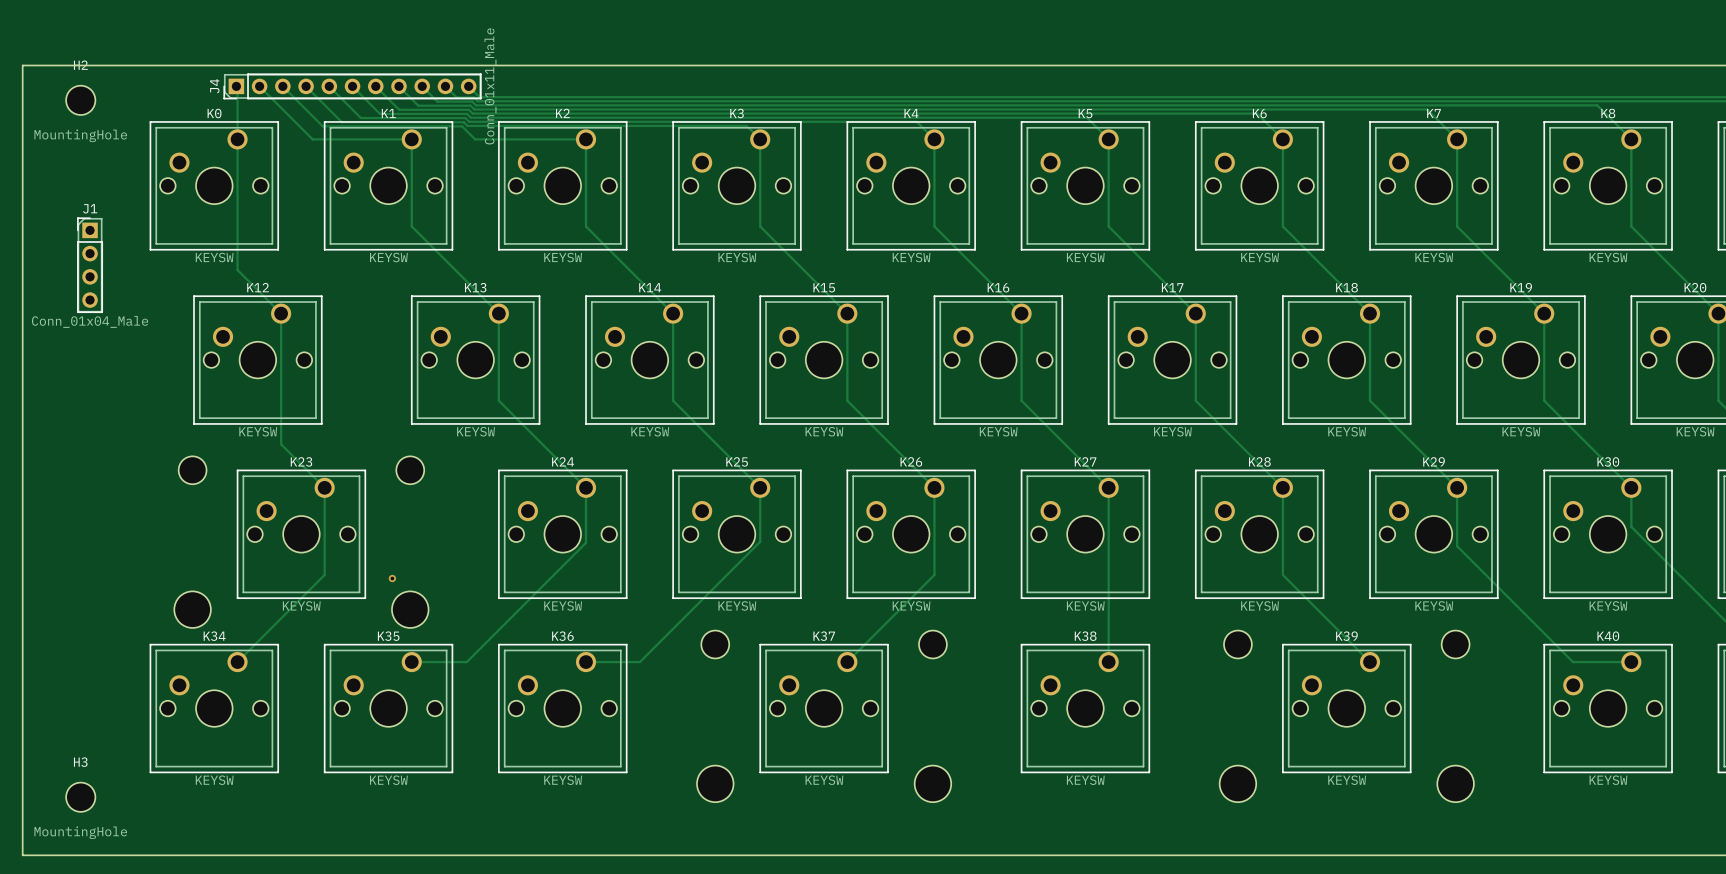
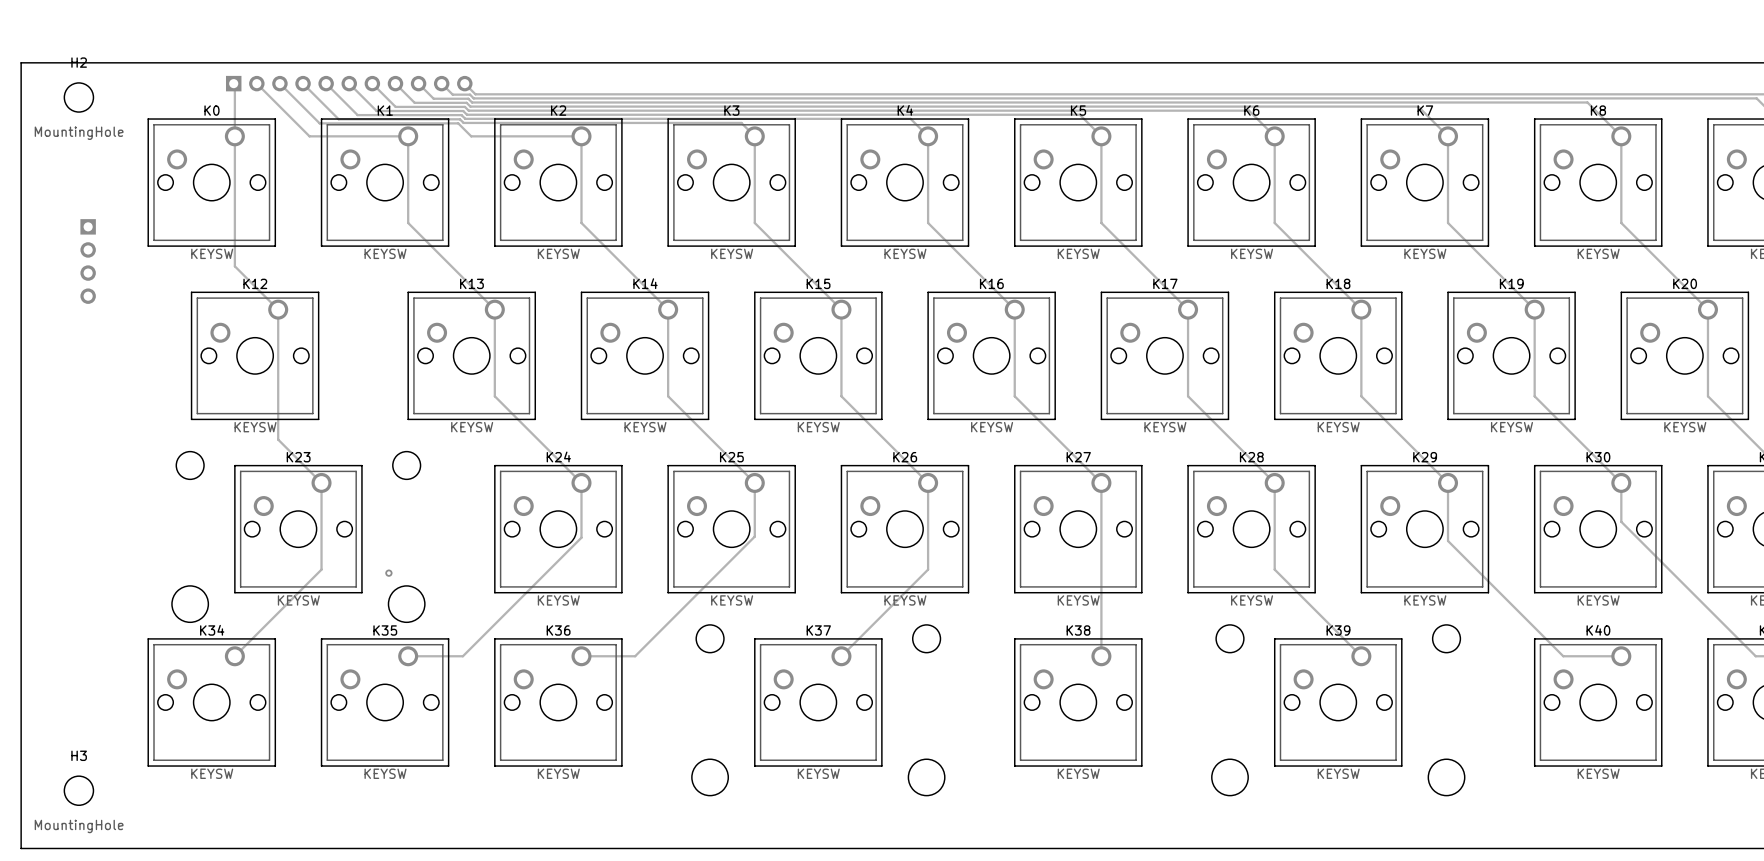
J4 side: top (352, 86) -> bottom (349, 83)
J1 side: top (90, 265) -> bottom (88, 261)

